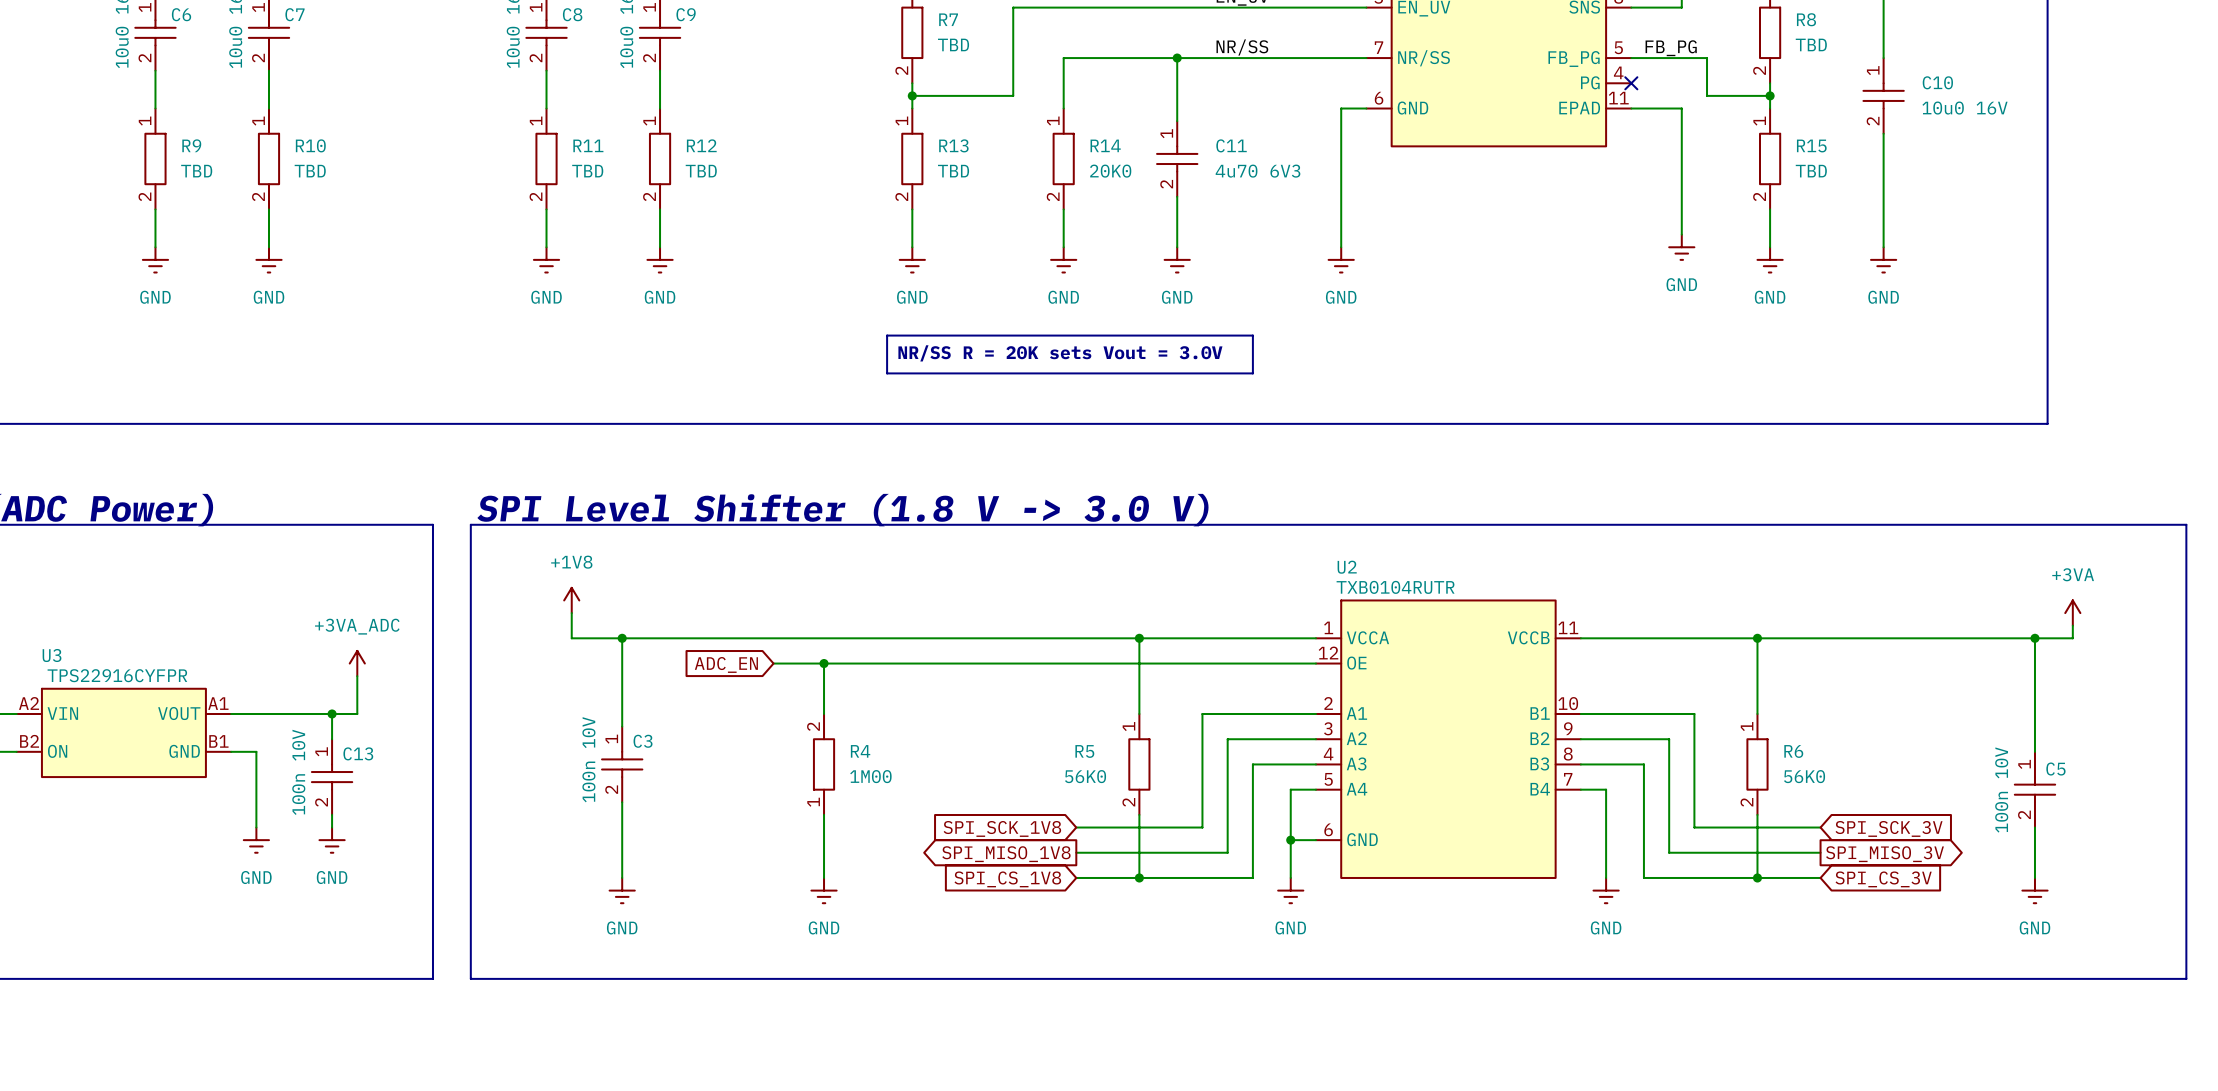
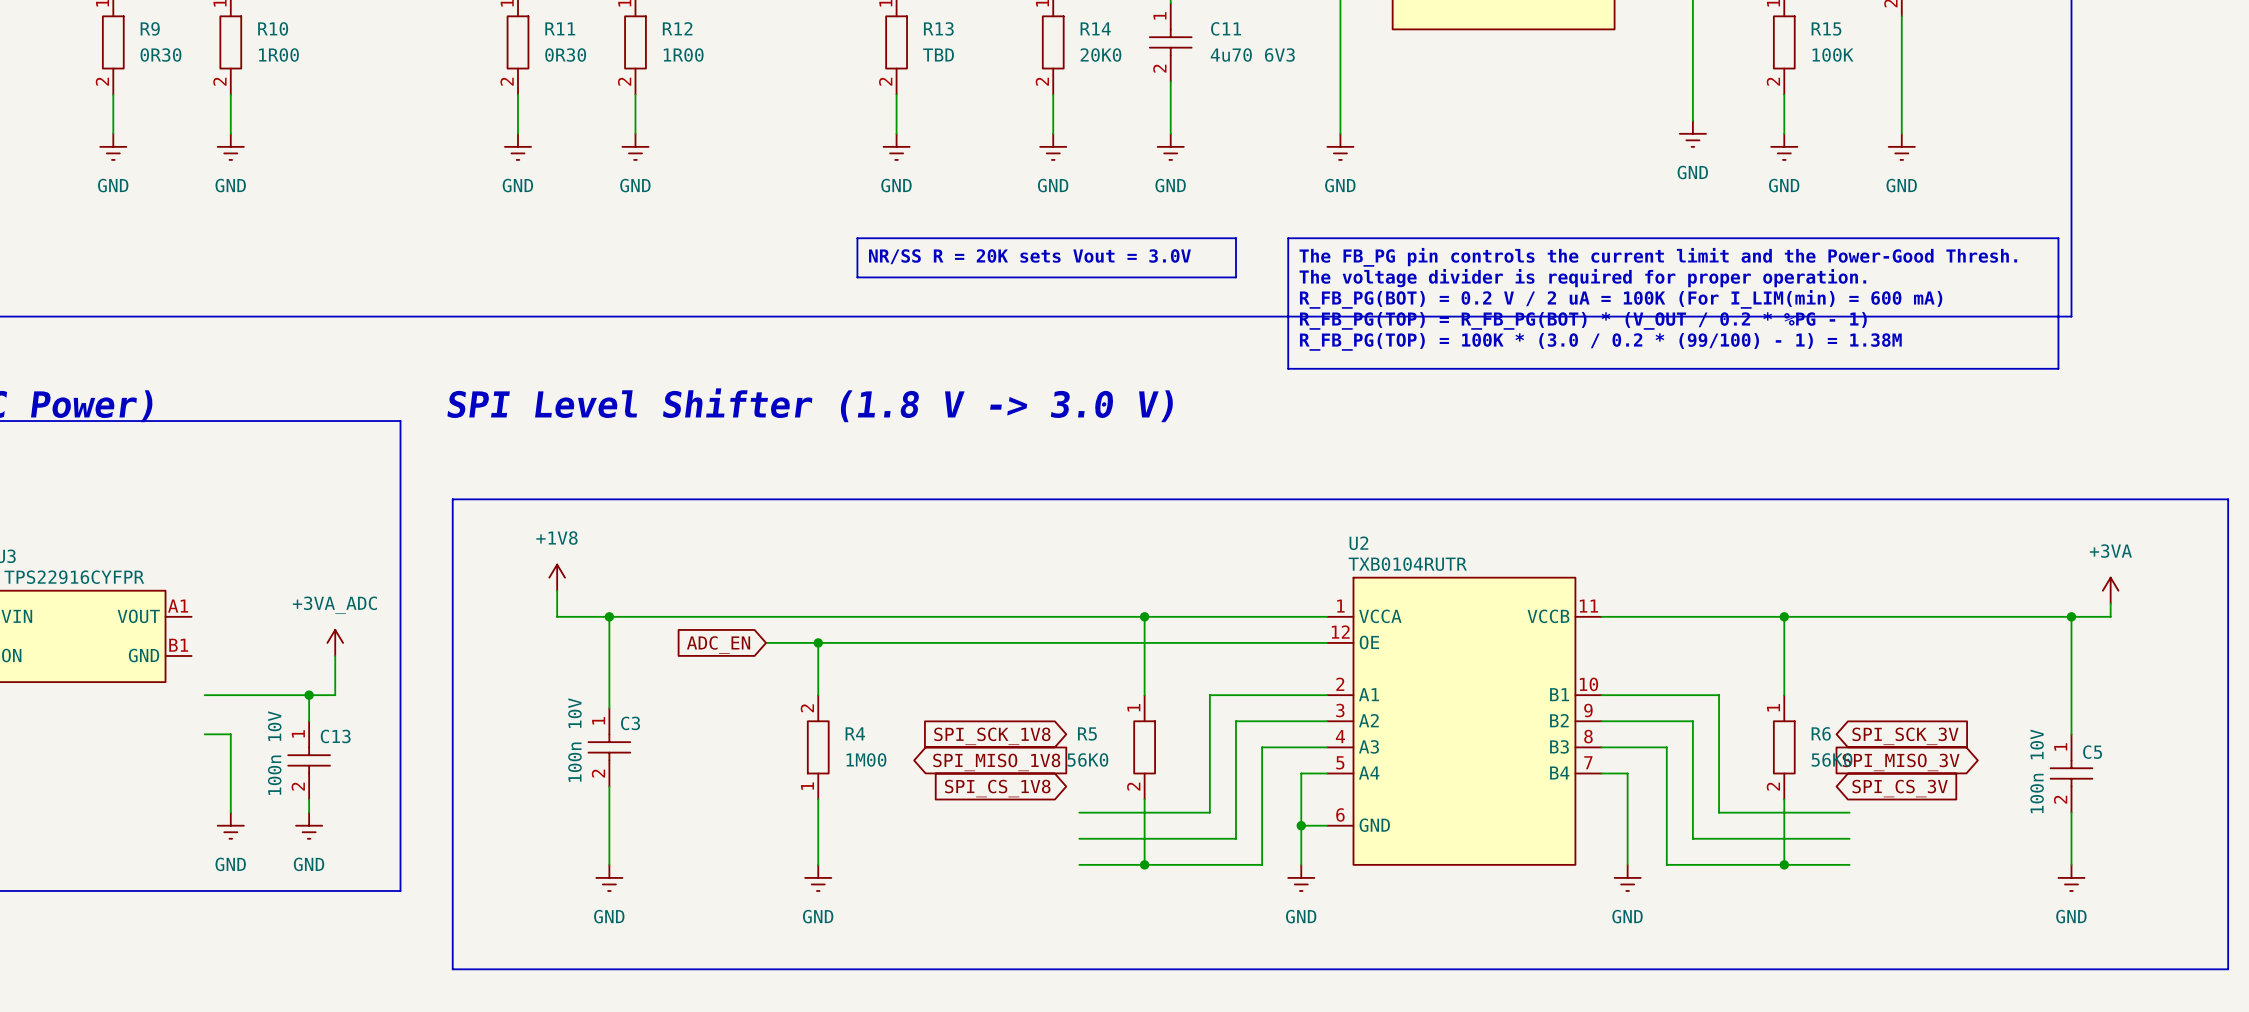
R9 value: TBD (196, 171) -> 0R30 (160, 55)
R10 value: TBD (310, 171) -> 1R00 (278, 55)
R11 value: TBD (587, 171) -> 0R30 (565, 55)
R12 value: TBD (701, 171) -> 1R00 (683, 55)
R15 value: TBD (1811, 171) -> 100K (1833, 55)
line: (887, 335) (1252, 335) (1252, 373) (887, 373) (887, 335) -> (857, 238) (1236, 238) (1236, 277) (857, 277) (857, 238)
line: none -> (1288, 238) (2058, 238) (2058, 368) (1288, 368) (1288, 238)
text position: NR/SS R = 20K sets Vout = 3.0V (1060, 353) -> NR/SS R = 20K sets Vout = 3.0V (1029, 256)
text: none -> The FB_PG pin controls the current limit and the Power-Good Thresh. (1658, 257)
text: none -> The voltage divider is required for proper operation. (1582, 278)
text: none -> R_FB_PG(BOT) = 0.2 V / 2 uA = 100K (For I_LIM(min) = 600 mA) (1621, 299)
text: none -> R_FB_PG(TOP) = R_FB_PG(BOT) * (V_OUT / 0.2 * %PG - 1) (1583, 320)
text: none -> R_FB_PG(TOP) = 100K * (3.0 / 0.2 * (99/100) - 1) = 1.38M (1600, 341)
line: (470, 524) (2186, 524) (2186, 978) (470, 978) (470, 524) -> (452, 499) (2228, 499) (2228, 969) (452, 969) (452, 499)
power symbol position: +1V8 (571, 600) -> +1V8 (557, 577)
wire: (571, 613) (571, 638) (1315, 638) -> none
power symbol position: +3VA (2072, 613) -> +3VA (2110, 590)
wire: (2072, 625) (2072, 638) (1580, 638) -> none
wire: (622, 638) (622, 726) -> (609, 616) (609, 708)
junction: (622, 638) -> none
wire: (1139, 638) (1139, 713) -> (1144, 616) (1144, 695)
junction: (1139, 638) -> none
wire: (1757, 638) (1757, 713) -> (1784, 616) (1784, 695)
junction: (1757, 638) -> none
wire: (2034, 638) (2034, 751) -> (2071, 616) (2071, 734)
junction: (2034, 638) -> none
power symbol position: +3VA_ADC (357, 663) -> +3VA_ADC (335, 642)
wire: (773, 663) (1315, 663) -> none
wire: (824, 663) (824, 713) -> (818, 642) (818, 695)
junction: (824, 663) -> none
global label position: ADC_EN (726, 664) -> ADC_EN (718, 644)
wire: (357, 676) (357, 713) (231, 713) -> (335, 656) (335, 695) (204, 695)
wire: (332, 713) (332, 739) -> (309, 695) (309, 721)
junction: (332, 713) -> none
junction: none -> (609, 616)
junction: none -> (1144, 616)
wire: (1202, 713) (1202, 827) (1076, 827) -> (1196, 616) (557, 616) (557, 590)
wire: (1694, 713) (1694, 827) (1820, 827) -> (1705, 616) (2110, 616) (2110, 603)
junction: none -> (1784, 616)
junction: none -> (2071, 616)
junction: none -> (818, 642)
wire: (1227, 739) (1227, 852) (1076, 852) -> (1222, 642) (766, 642)
U2 position: (1448, 739) -> (1464, 721)
wire: (1580, 739) (1669, 739) (1669, 852) (1820, 852) -> (1601, 721) (1692, 721) (1692, 838) (1849, 838)
wire: (231, 751) (256, 751) (256, 827) -> (204, 734) (230, 734) (230, 812)
C3 position: (622, 764) -> (609, 747)
R4 position: (824, 764) -> (818, 747)
R5 position: (1139, 764) -> (1144, 747)
wire: (1315, 764) (1252, 764) (1252, 877) (1076, 877) -> none
wire: (1580, 764) (1643, 764) (1643, 877) (1820, 877) -> (1601, 747) (1666, 747) (1666, 864) (1849, 864)
R6 position: (1757, 764) -> (1784, 747)
C13 position: (332, 777) -> (309, 760)
junction: none -> (309, 695)
wire: (1290, 789) (1290, 877) -> (1288, 695) (1209, 695) (1209, 812) (1079, 812)
wire: (1606, 789) (1606, 877) -> (1614, 695) (1719, 695) (1719, 812) (1849, 812)
C5 position: (2034, 789) -> (2071, 773)
wire: (622, 802) (622, 877) -> (609, 786) (609, 864)
wire: (332, 814) (332, 827) -> (309, 799) (309, 812)
wire: (824, 814) (824, 877) -> (818, 799) (818, 864)
wire: (1139, 814) (1139, 877) -> (1144, 799) (1144, 864)
wire: none -> (1327, 721) (1236, 721) (1236, 838) (1079, 838)
wire: (1757, 814) (1757, 877) -> (1784, 799) (1784, 864)
wire: (2034, 827) (2034, 877) -> (2071, 812) (2071, 864)
power symbol: GND (256, 840) -> none
power symbol: GND (332, 840) -> none
wire: none -> (1288, 747) (1262, 747) (1262, 864) (1079, 864)
junction: (1290, 840) -> none
wire: none -> (1327, 773) (1301, 773) (1301, 864)
wire: none -> (1601, 773) (1627, 773) (1627, 864)
junction: (1139, 877) -> none
junction: (1757, 877) -> none
power symbol position: GND (622, 890) -> GND (609, 877)
power symbol position: GND (824, 890) -> GND (818, 877)
power symbol position: GND (1290, 890) -> GND (1301, 877)
power symbol position: GND (1606, 890) -> GND (1627, 877)
power symbol position: GND (2034, 890) -> GND (2071, 877)
power symbol: none -> GND (230, 825)
power symbol: none -> GND (309, 825)
wire: none -> (1301, 825) (1327, 825)
junction: none -> (1301, 825)
junction: none -> (1144, 864)
junction: none -> (1784, 864)

